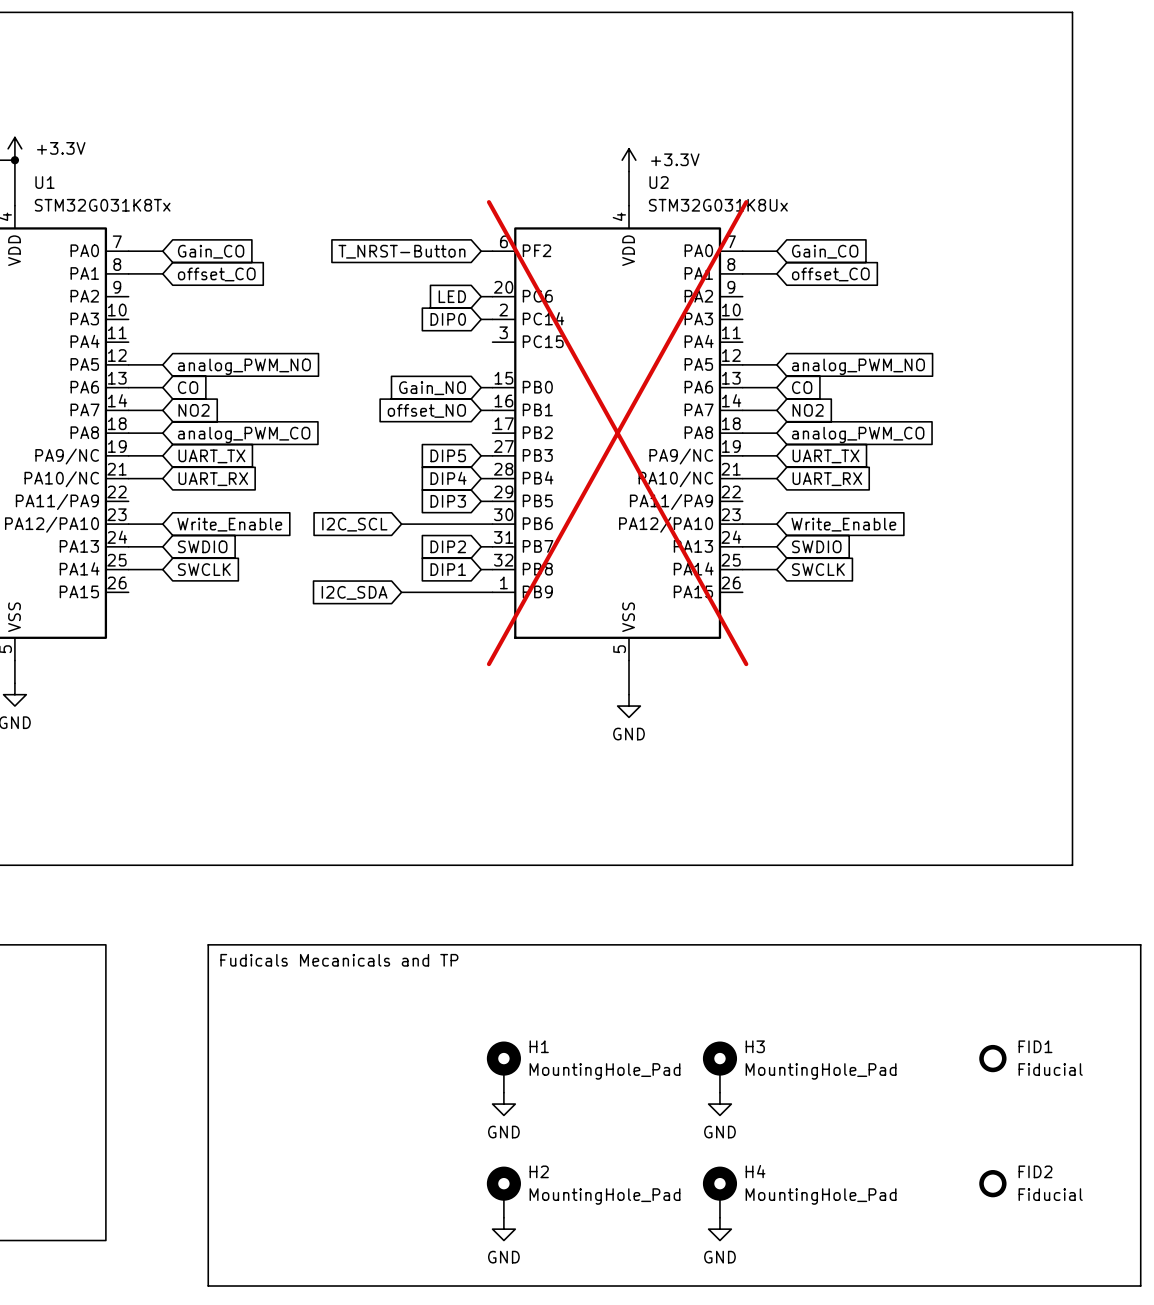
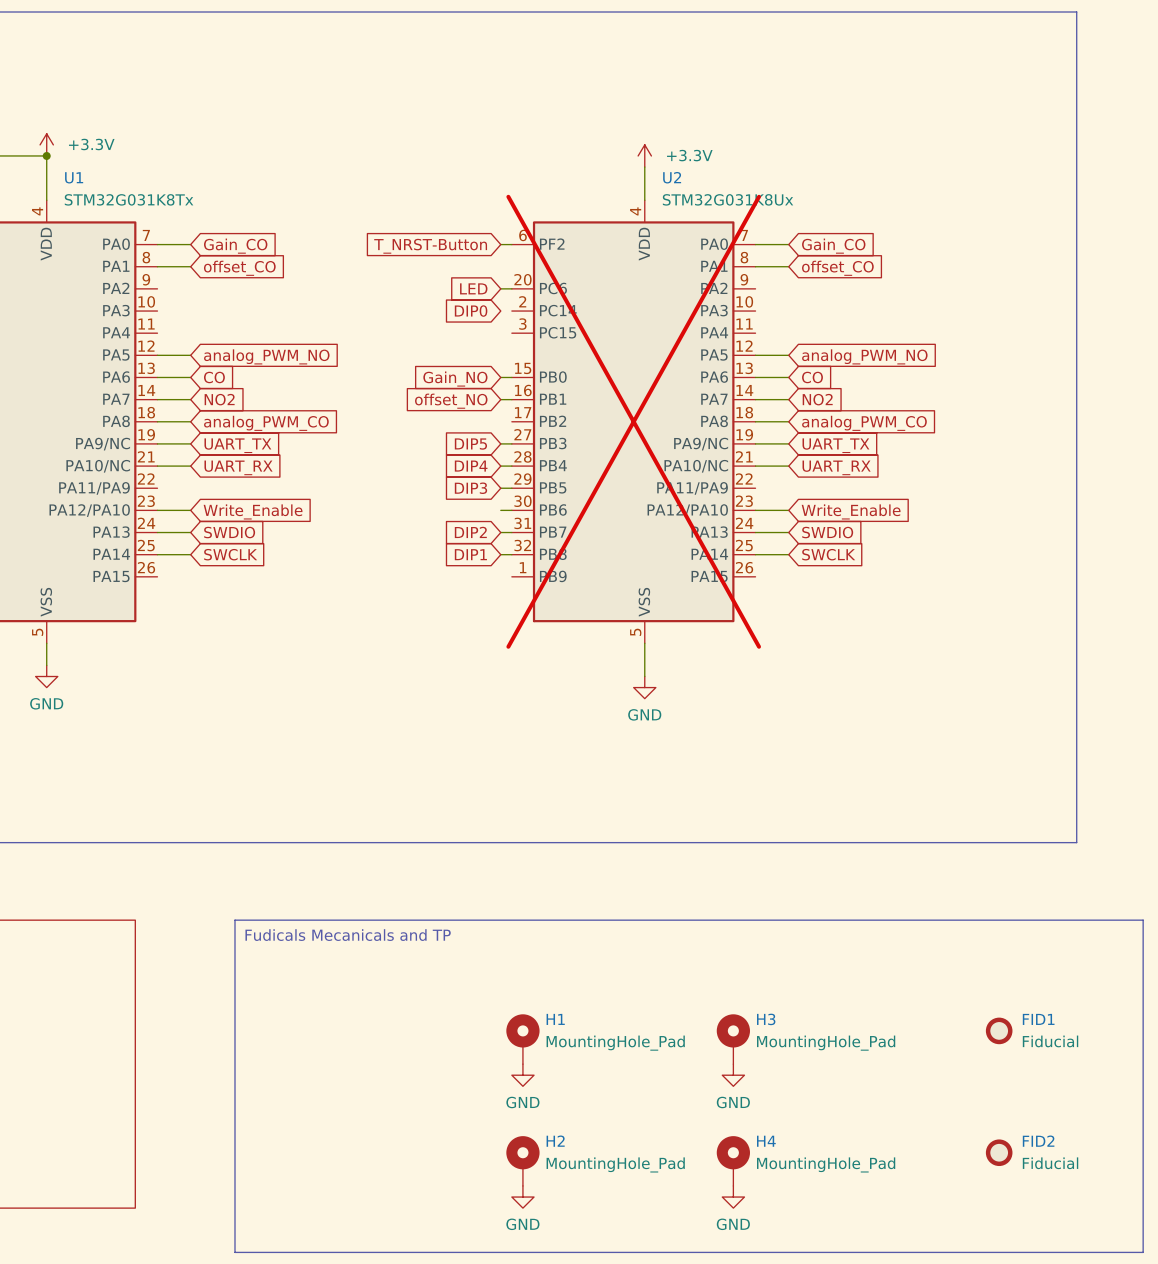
wire: (481, 319) (492, 319) -> none
global label: I2C_SCL (354, 524) -> none
wire: (401, 524) (481, 524) -> none
global label: I2C_SDA (354, 592) -> none
wire: (401, 592) (492, 592) -> none

